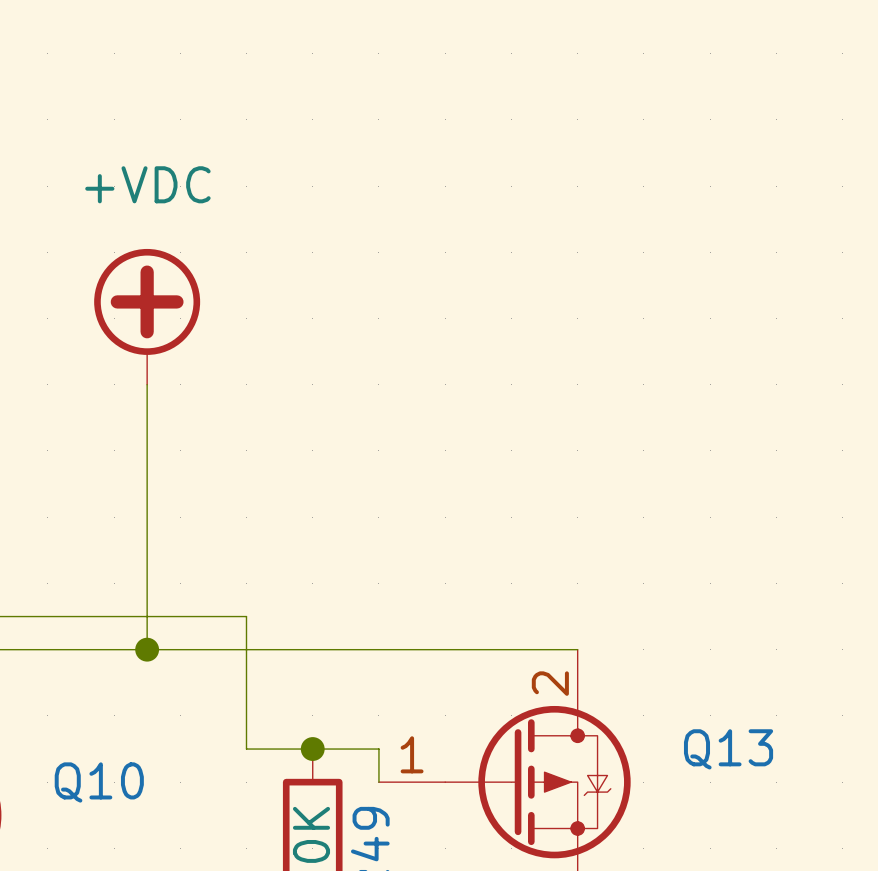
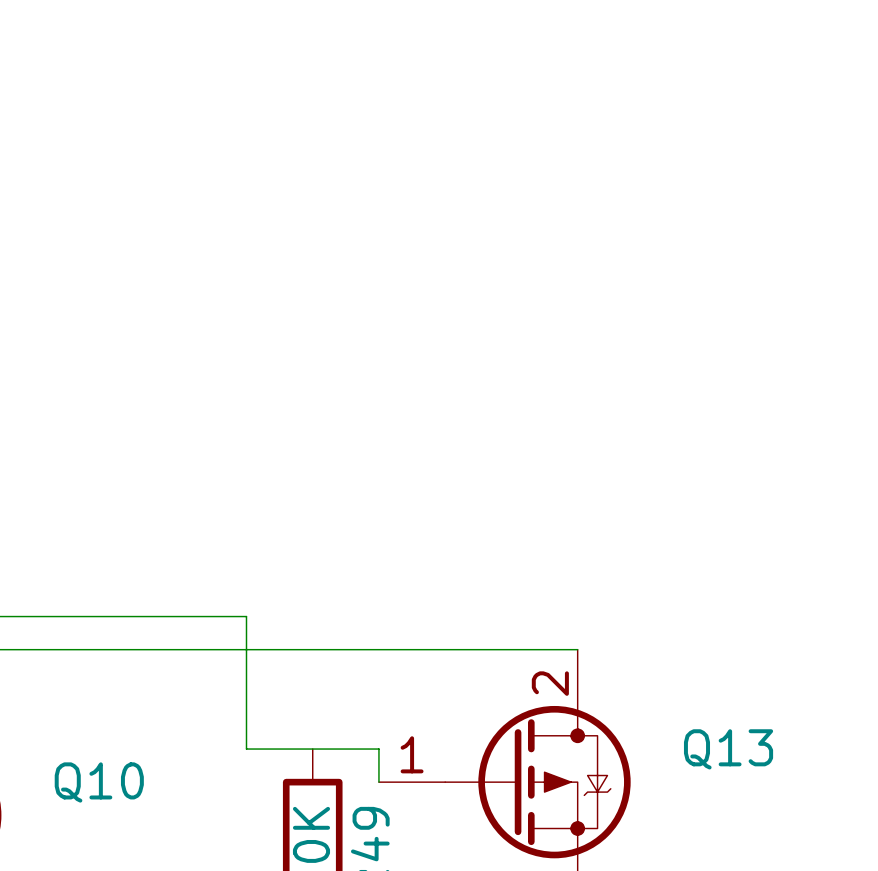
power symbol: +VDC (147, 316) -> none
wire: (147, 384) (147, 649) -> none
junction: (147, 649) -> none
junction: (312, 749) -> none

